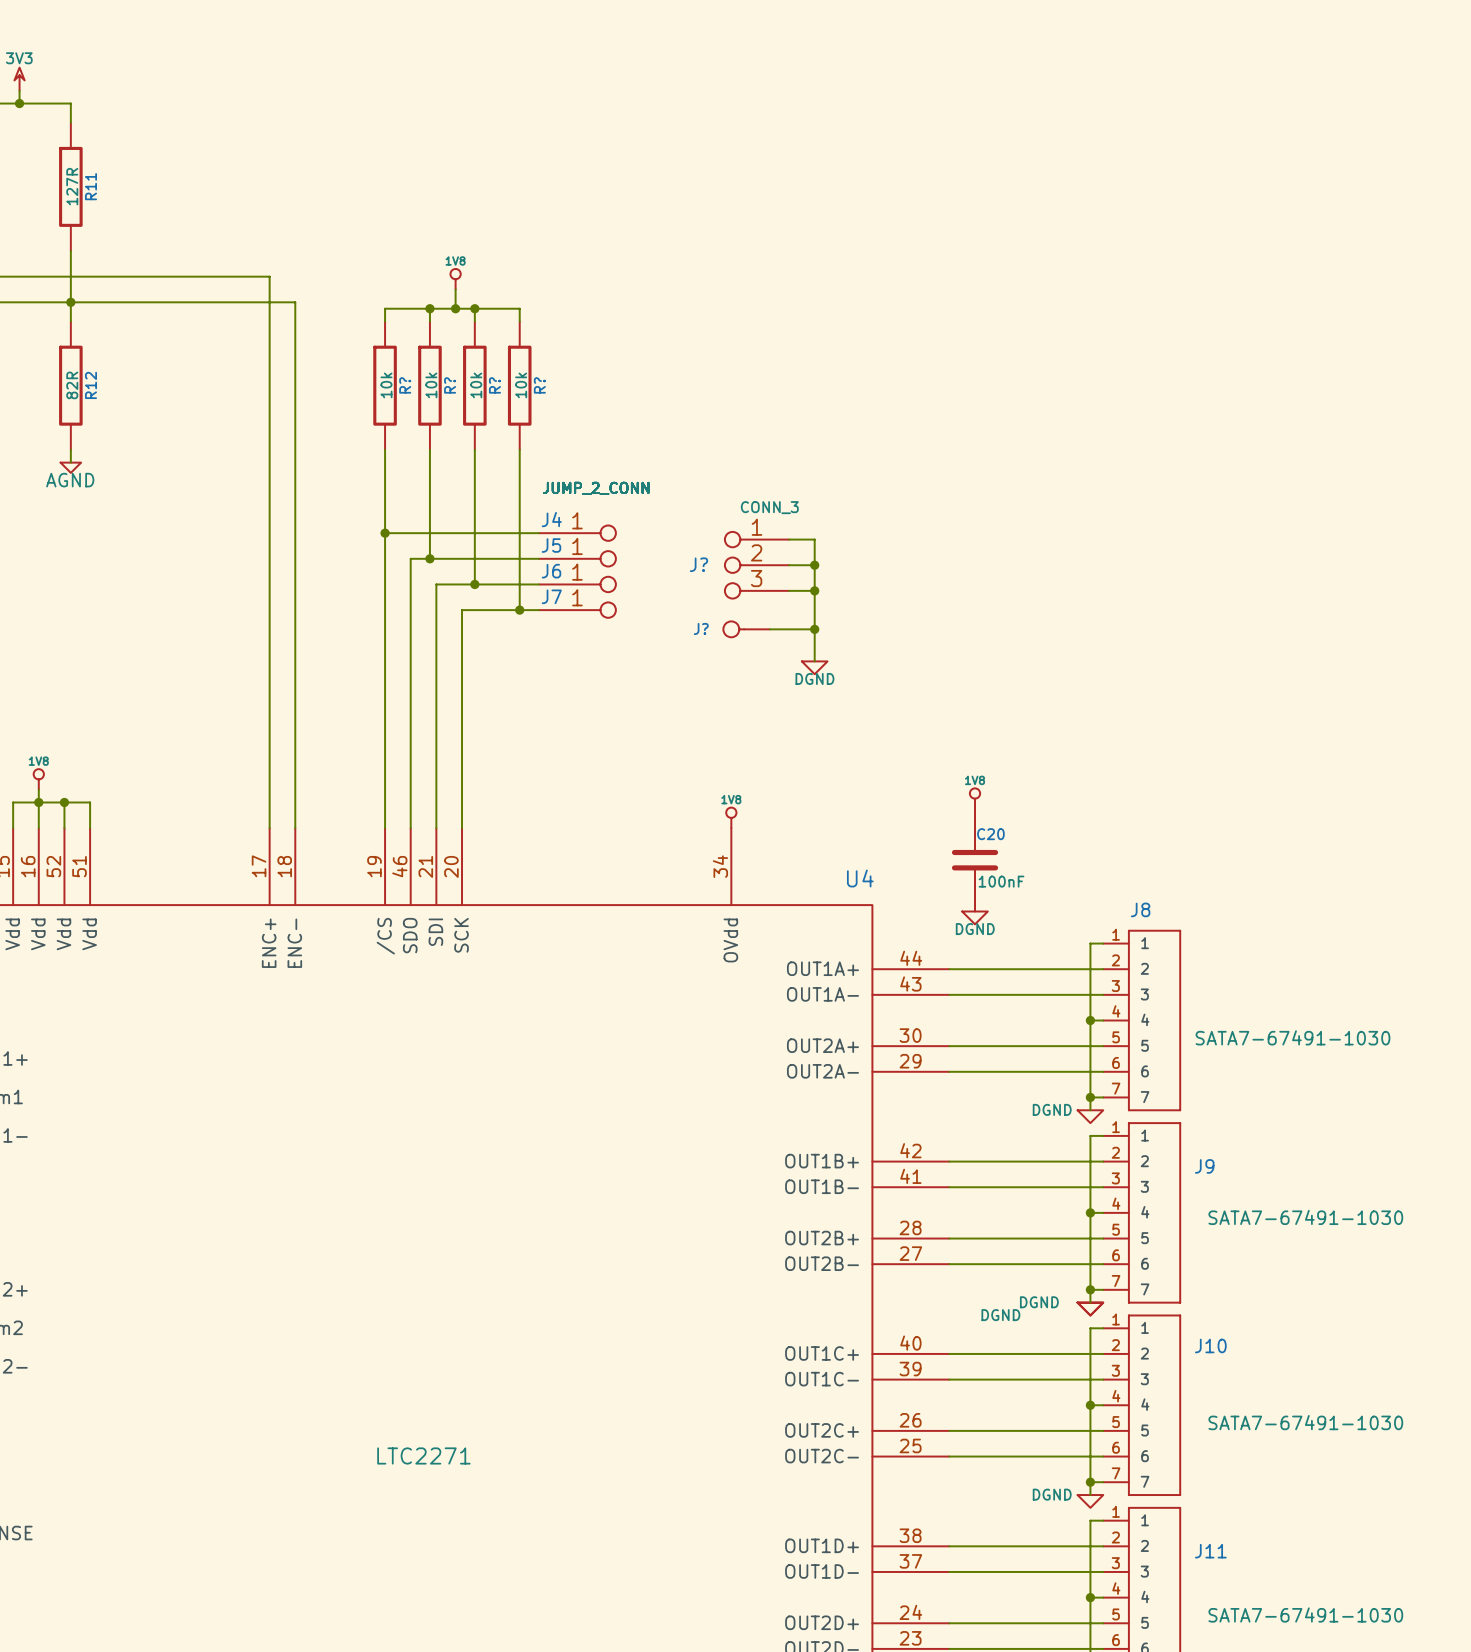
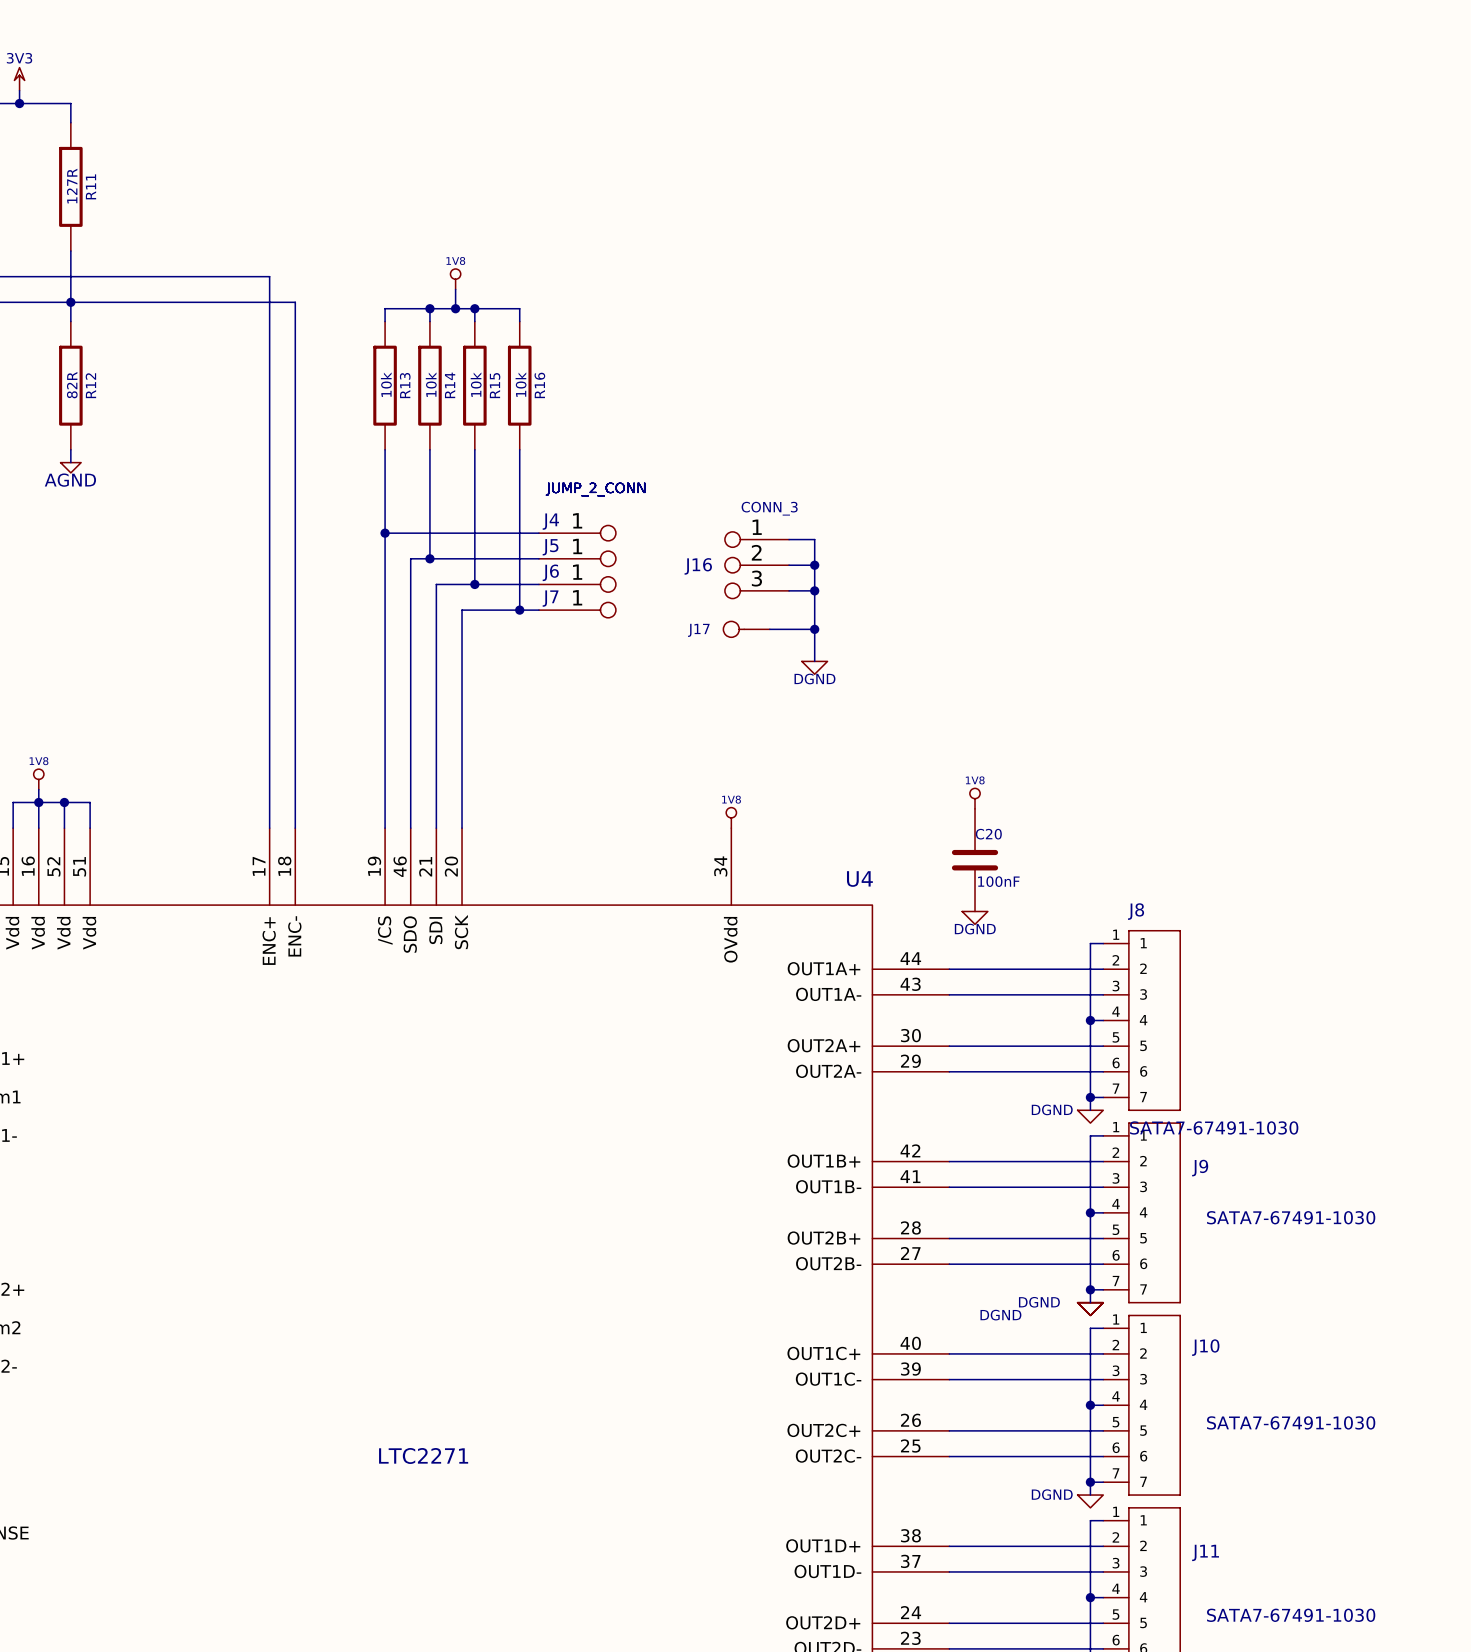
R? name: R? (405, 385) -> R13 (405, 385)
R? name: R? (450, 385) -> R14 (450, 385)
R? name: R? (494, 385) -> R15 (495, 385)
R? name: R? (539, 385) -> R16 (539, 385)
J? name: J? (698, 564) -> J16 (698, 566)
J? name: J? (701, 628) -> J17 (698, 630)
J8 value position: SATA7-67491-1030 (1292, 1037) -> SATA7-67491-1030 (1214, 1127)

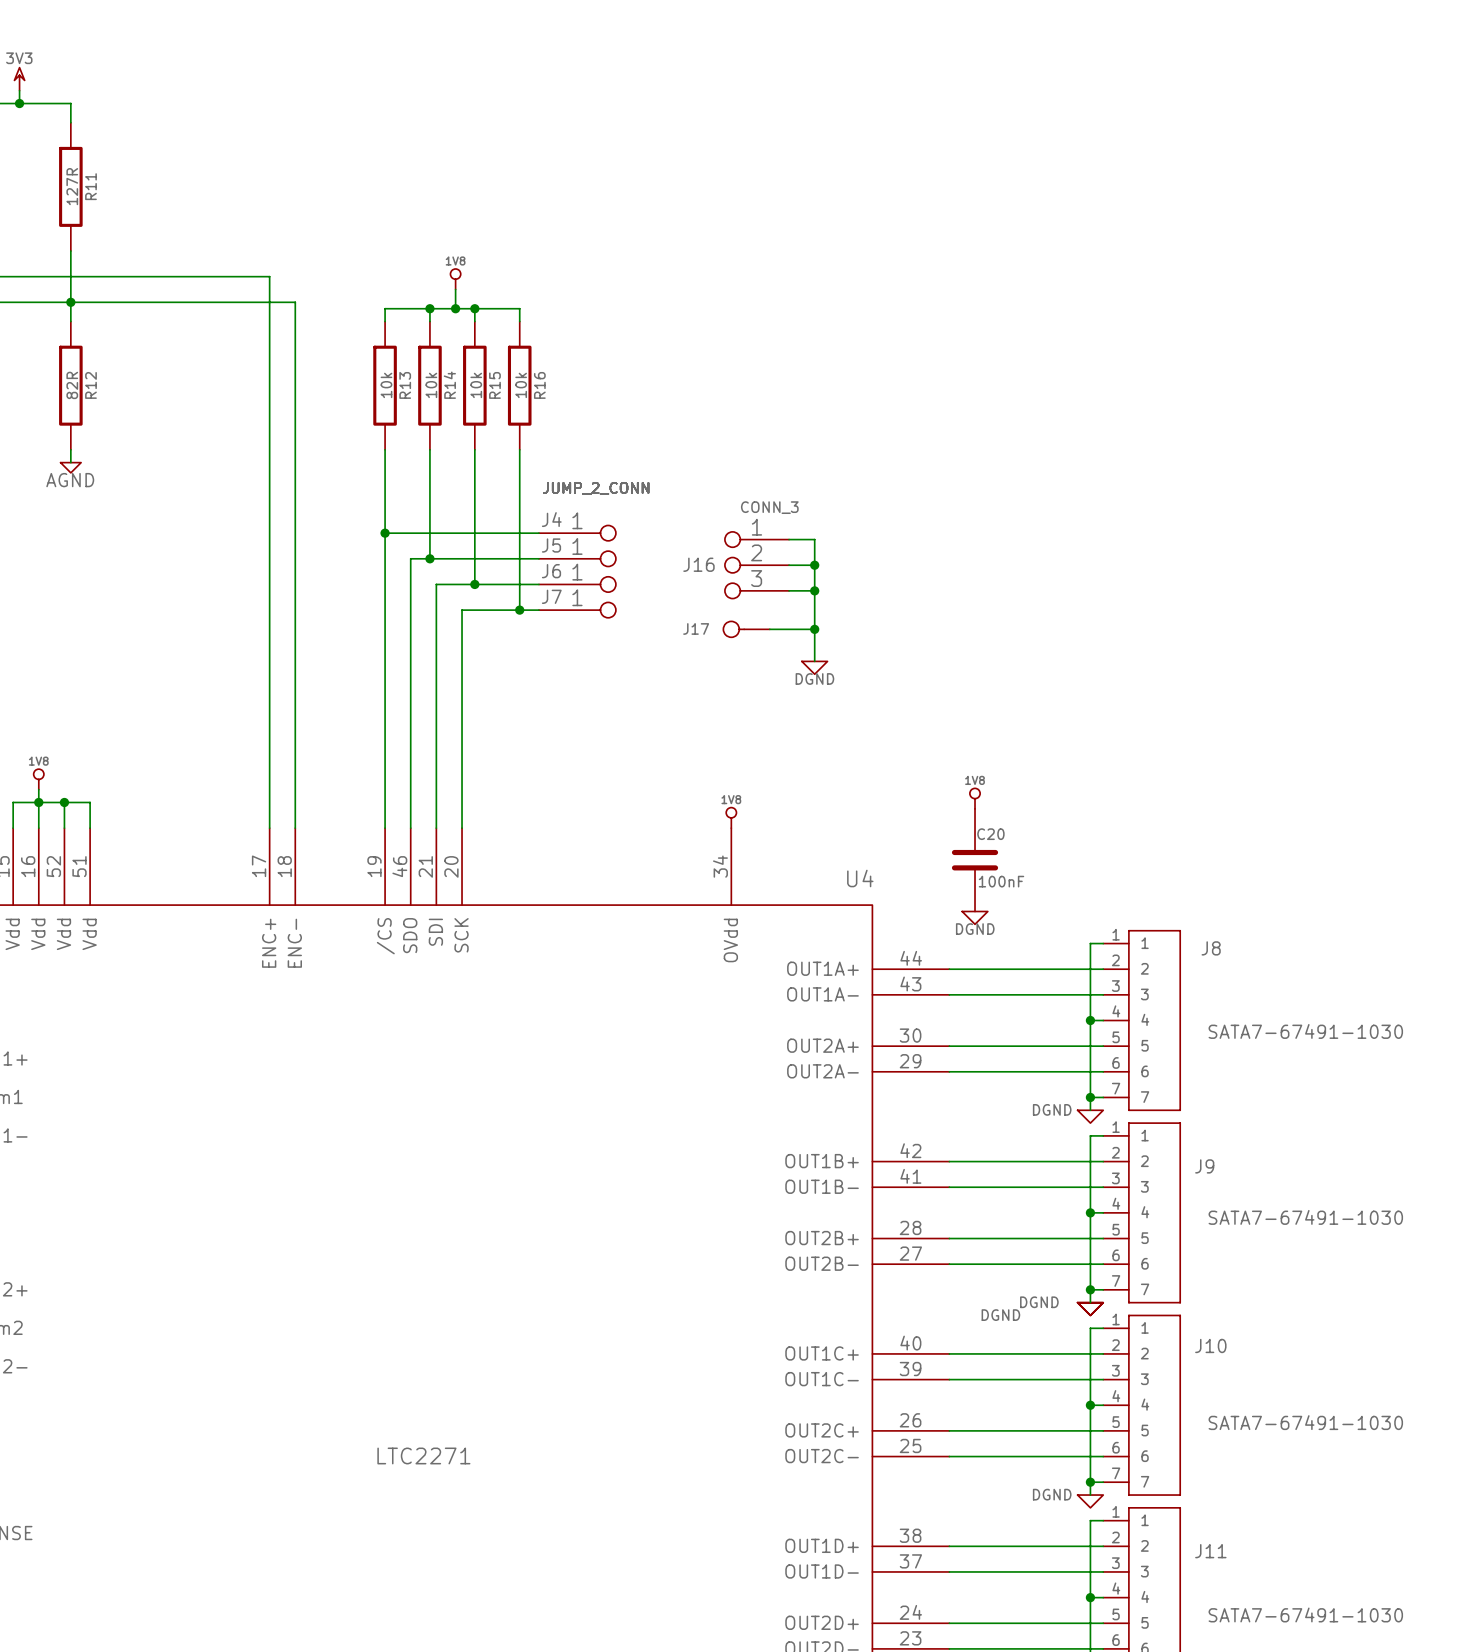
J8 name position: J8 (1136, 911) -> J8 (1211, 948)
J8 value position: SATA7-67491-1030 (1214, 1127) -> SATA7-67491-1030 (1305, 1031)

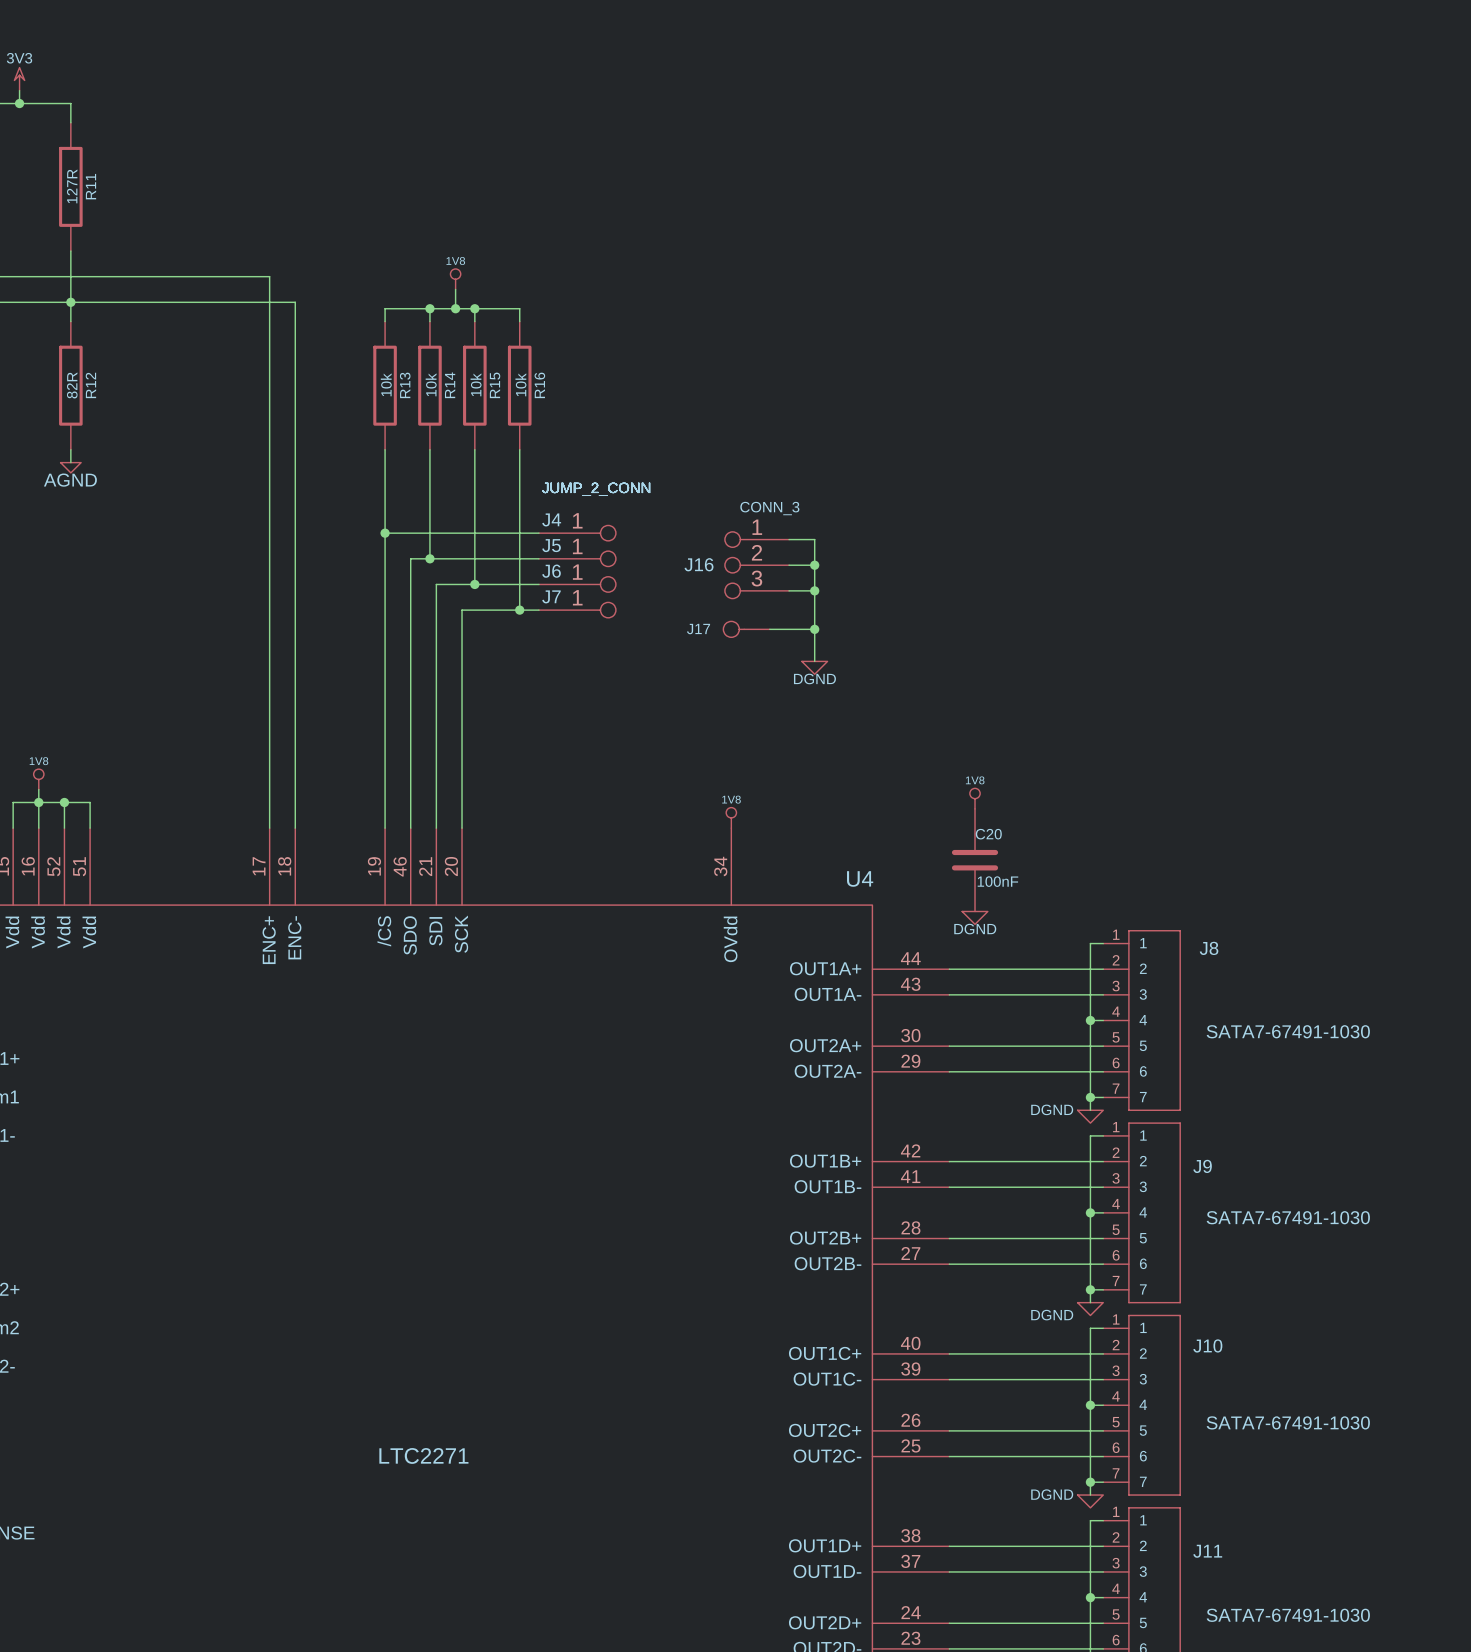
power symbol: DGND (1090, 1309) -> none
power symbol: DGND (1090, 1309) -> none
power symbol: none -> DGND (1090, 1309)

